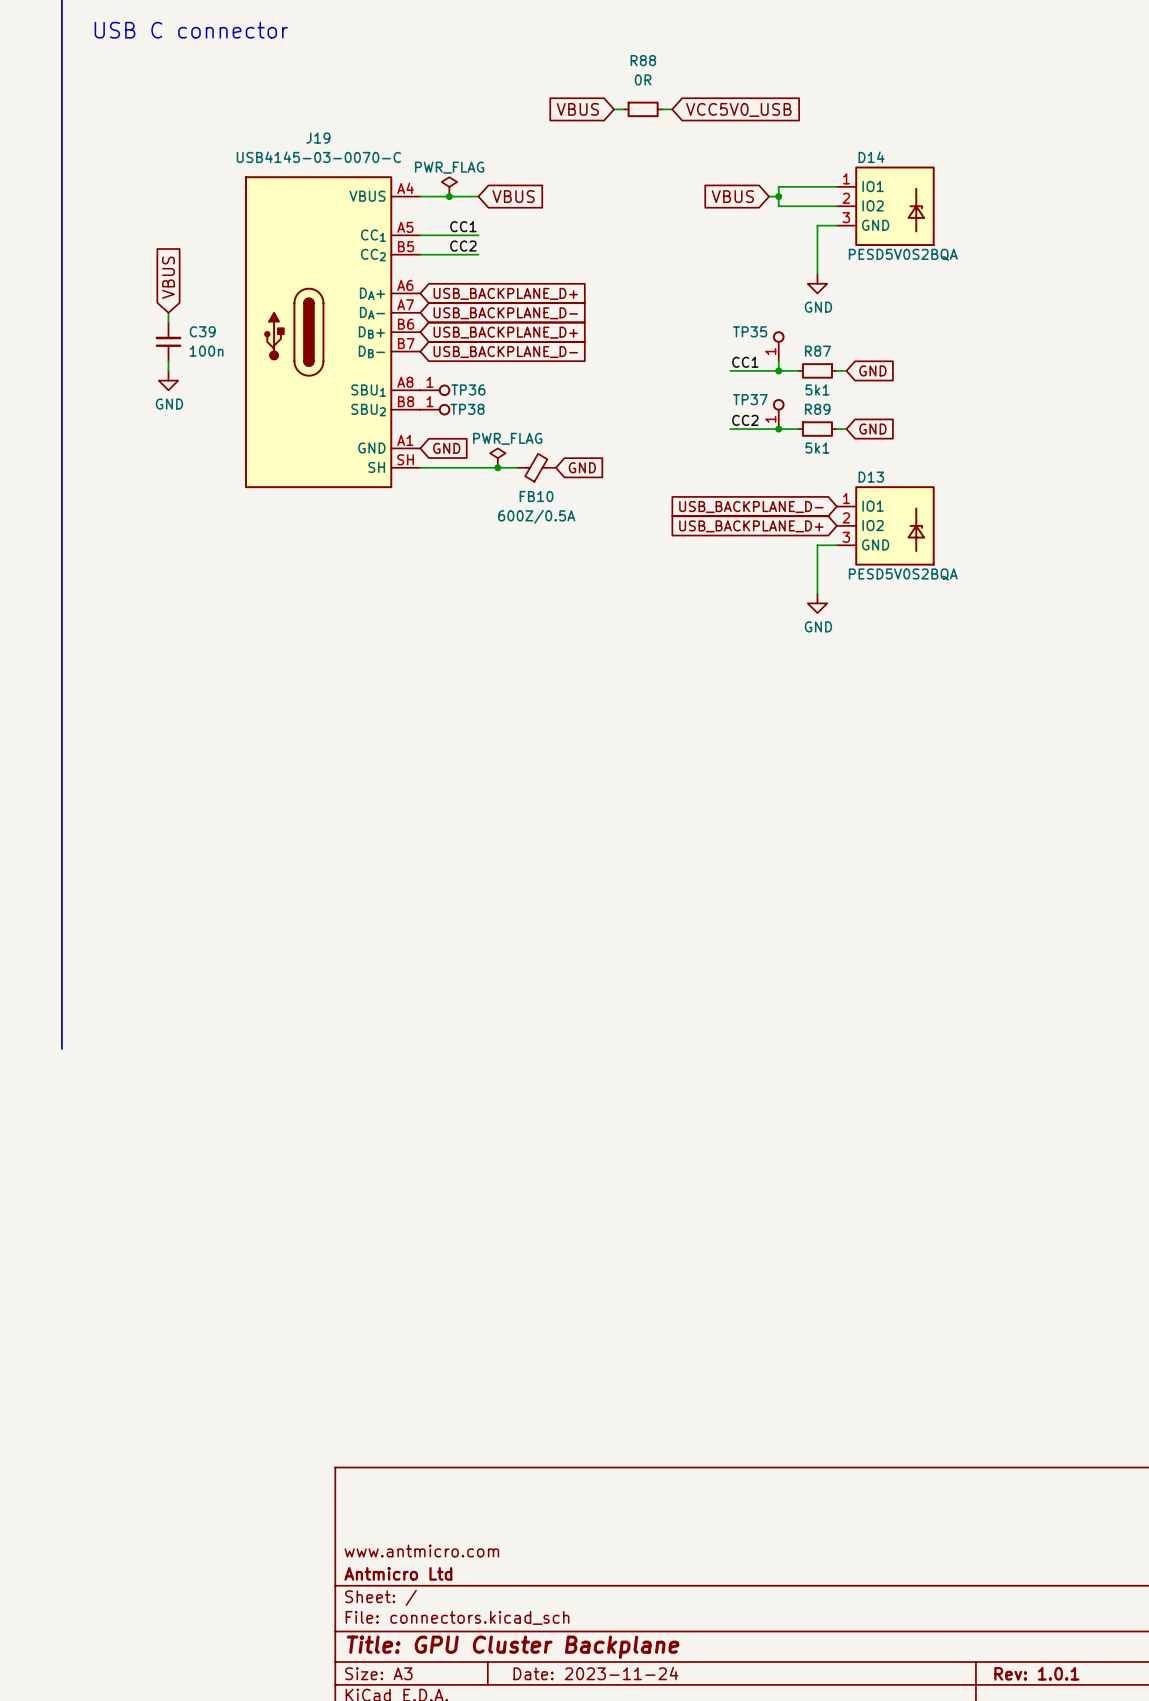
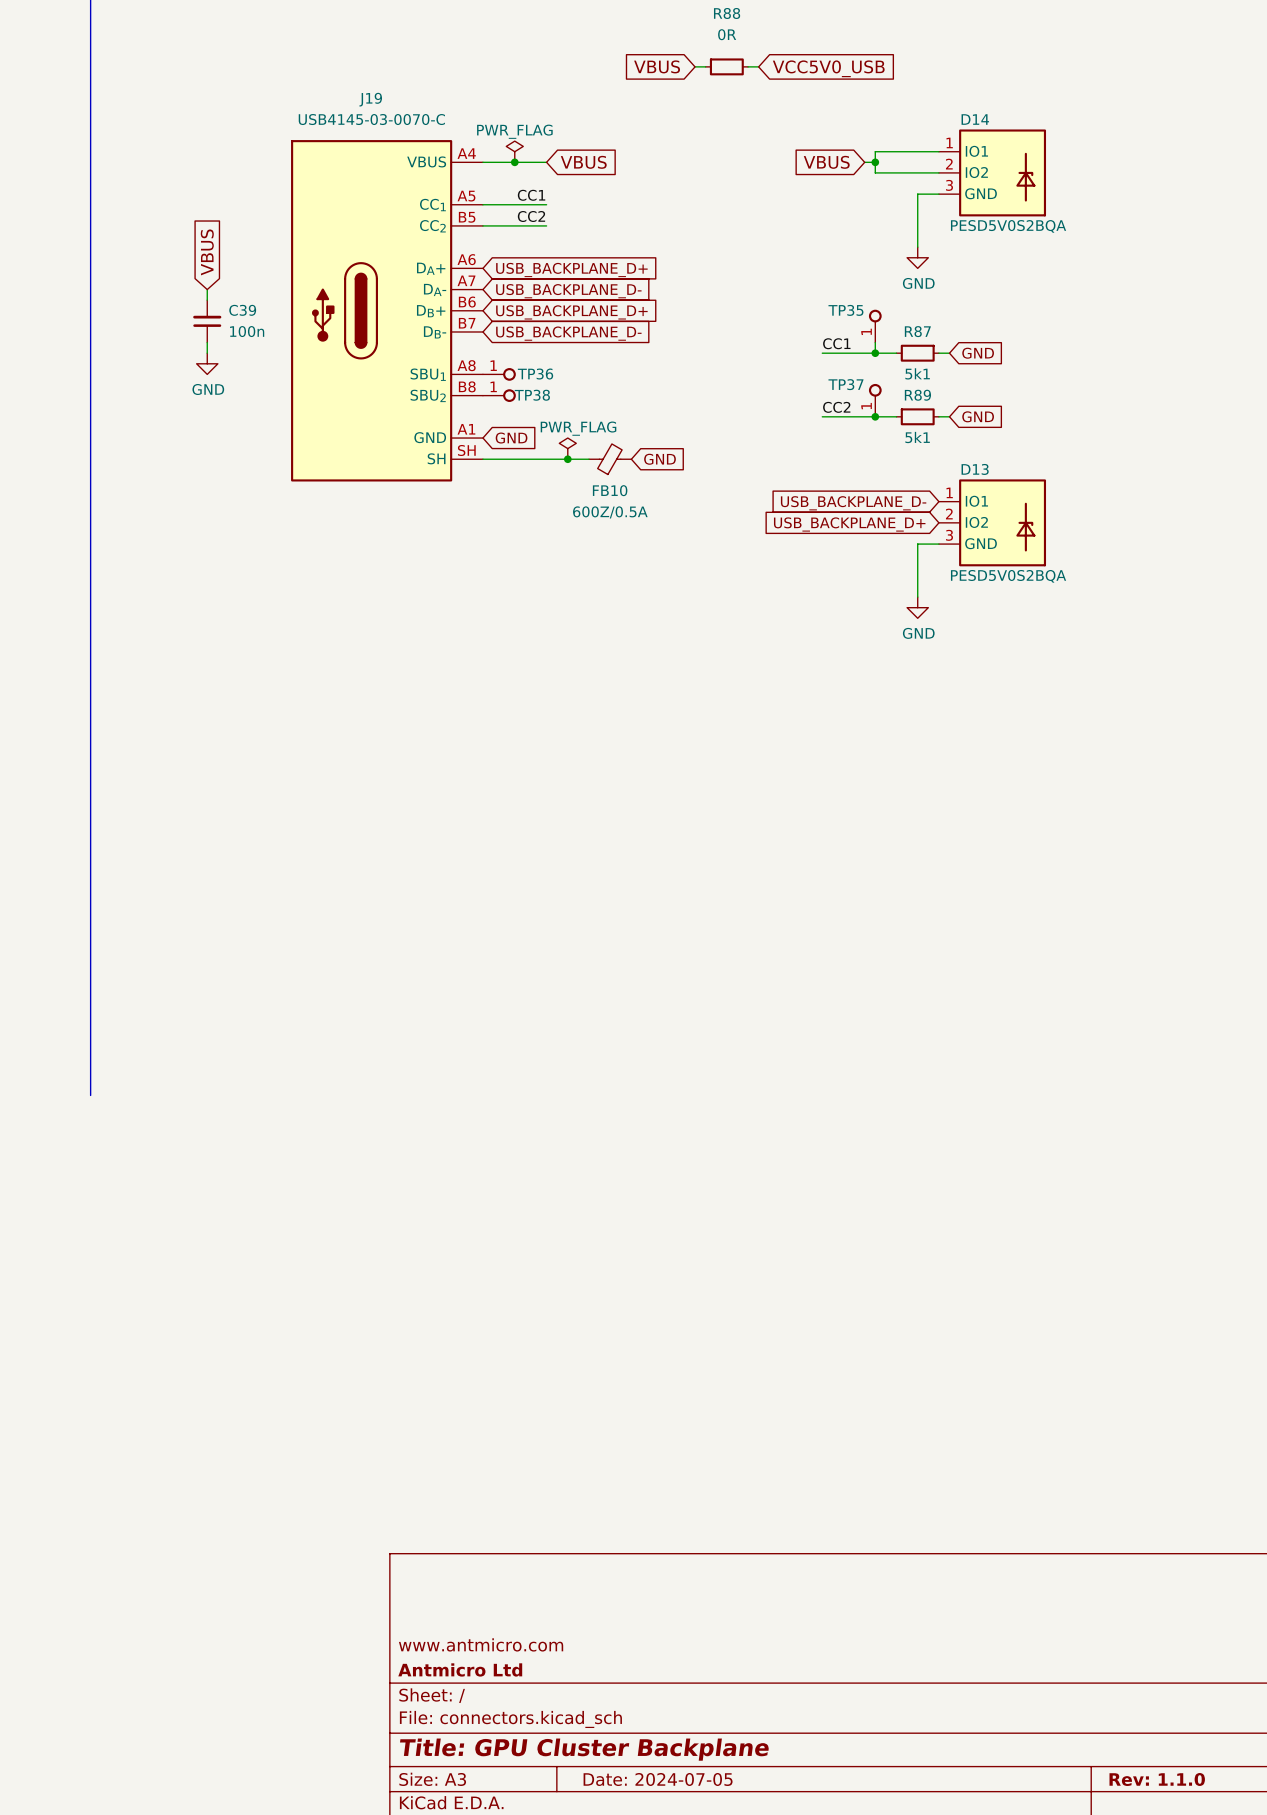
title block: Date: 2023-11-24 (595, 1673) -> Date: 2024-07-05 (658, 1779)
title block: Rev: 1.0.1 (1036, 1673) -> Rev: 1.1.0 (1157, 1779)

